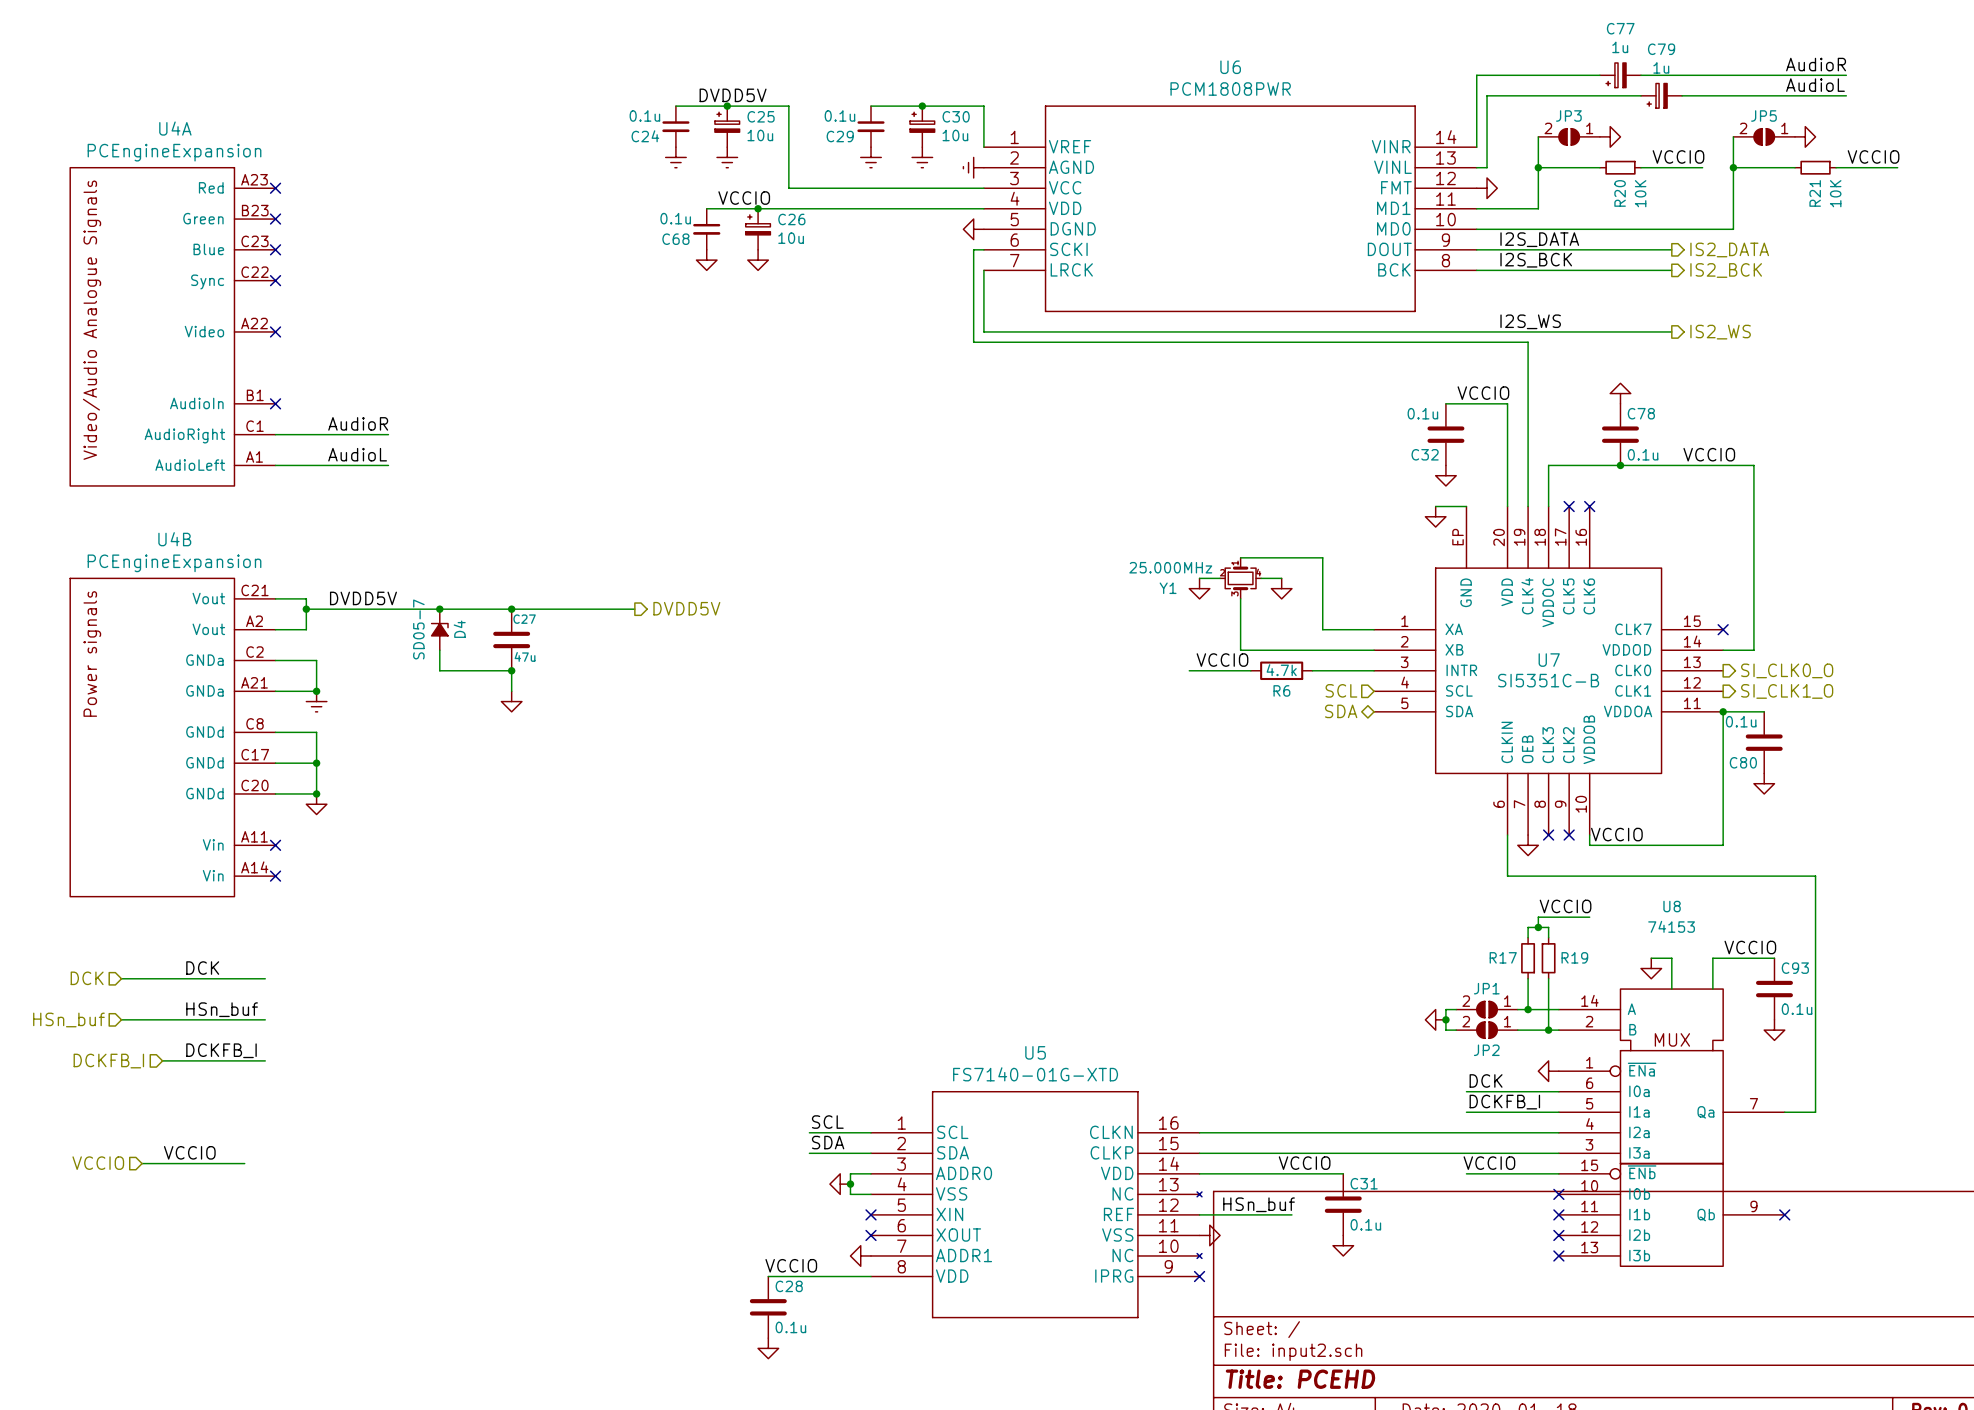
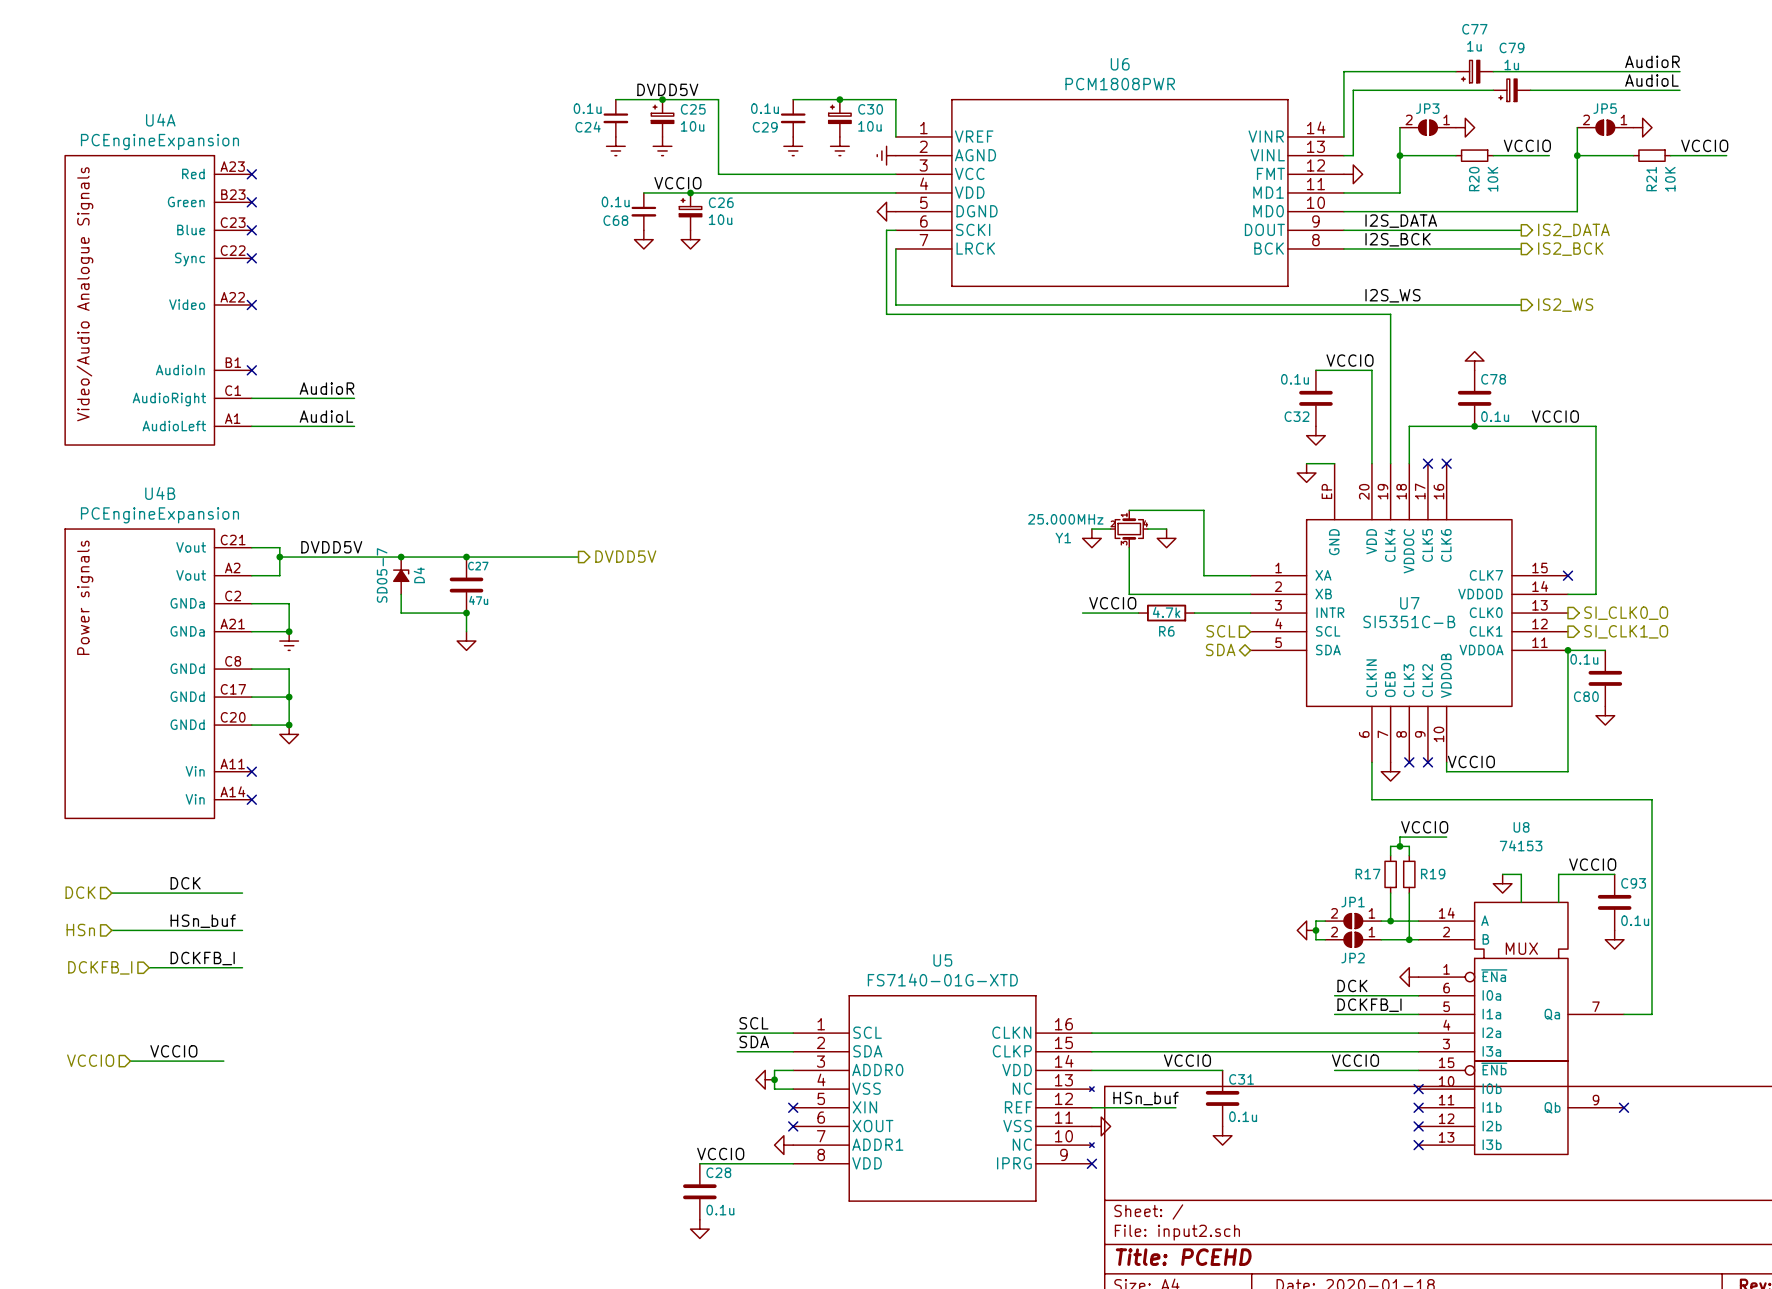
hierarchical label: HSn_buf (68, 1019) -> HSn (80, 929)

